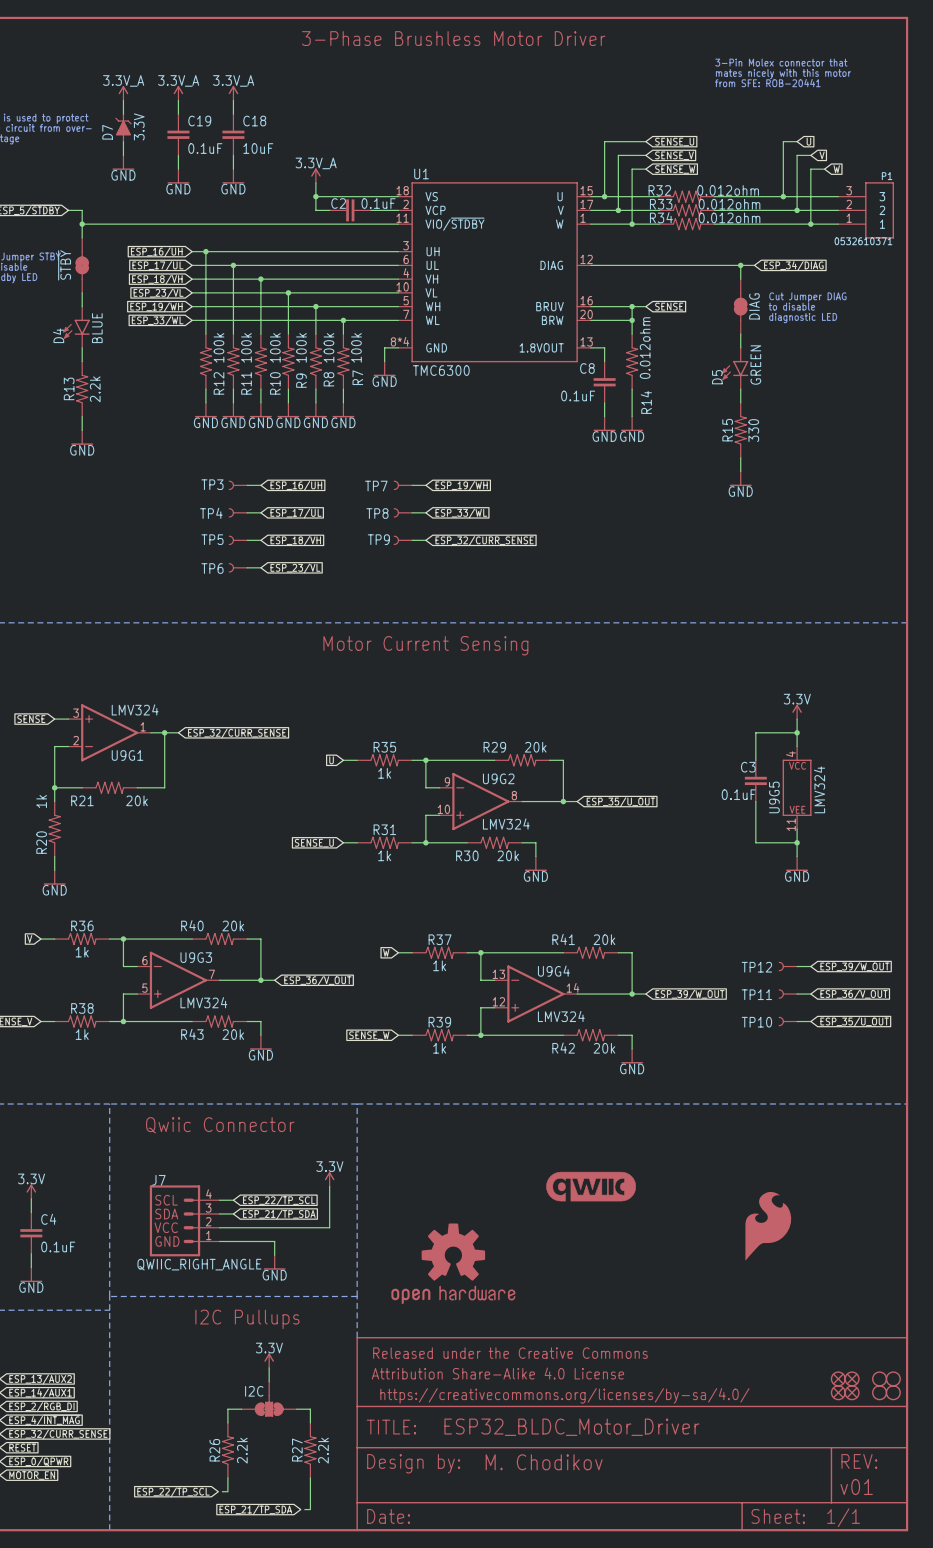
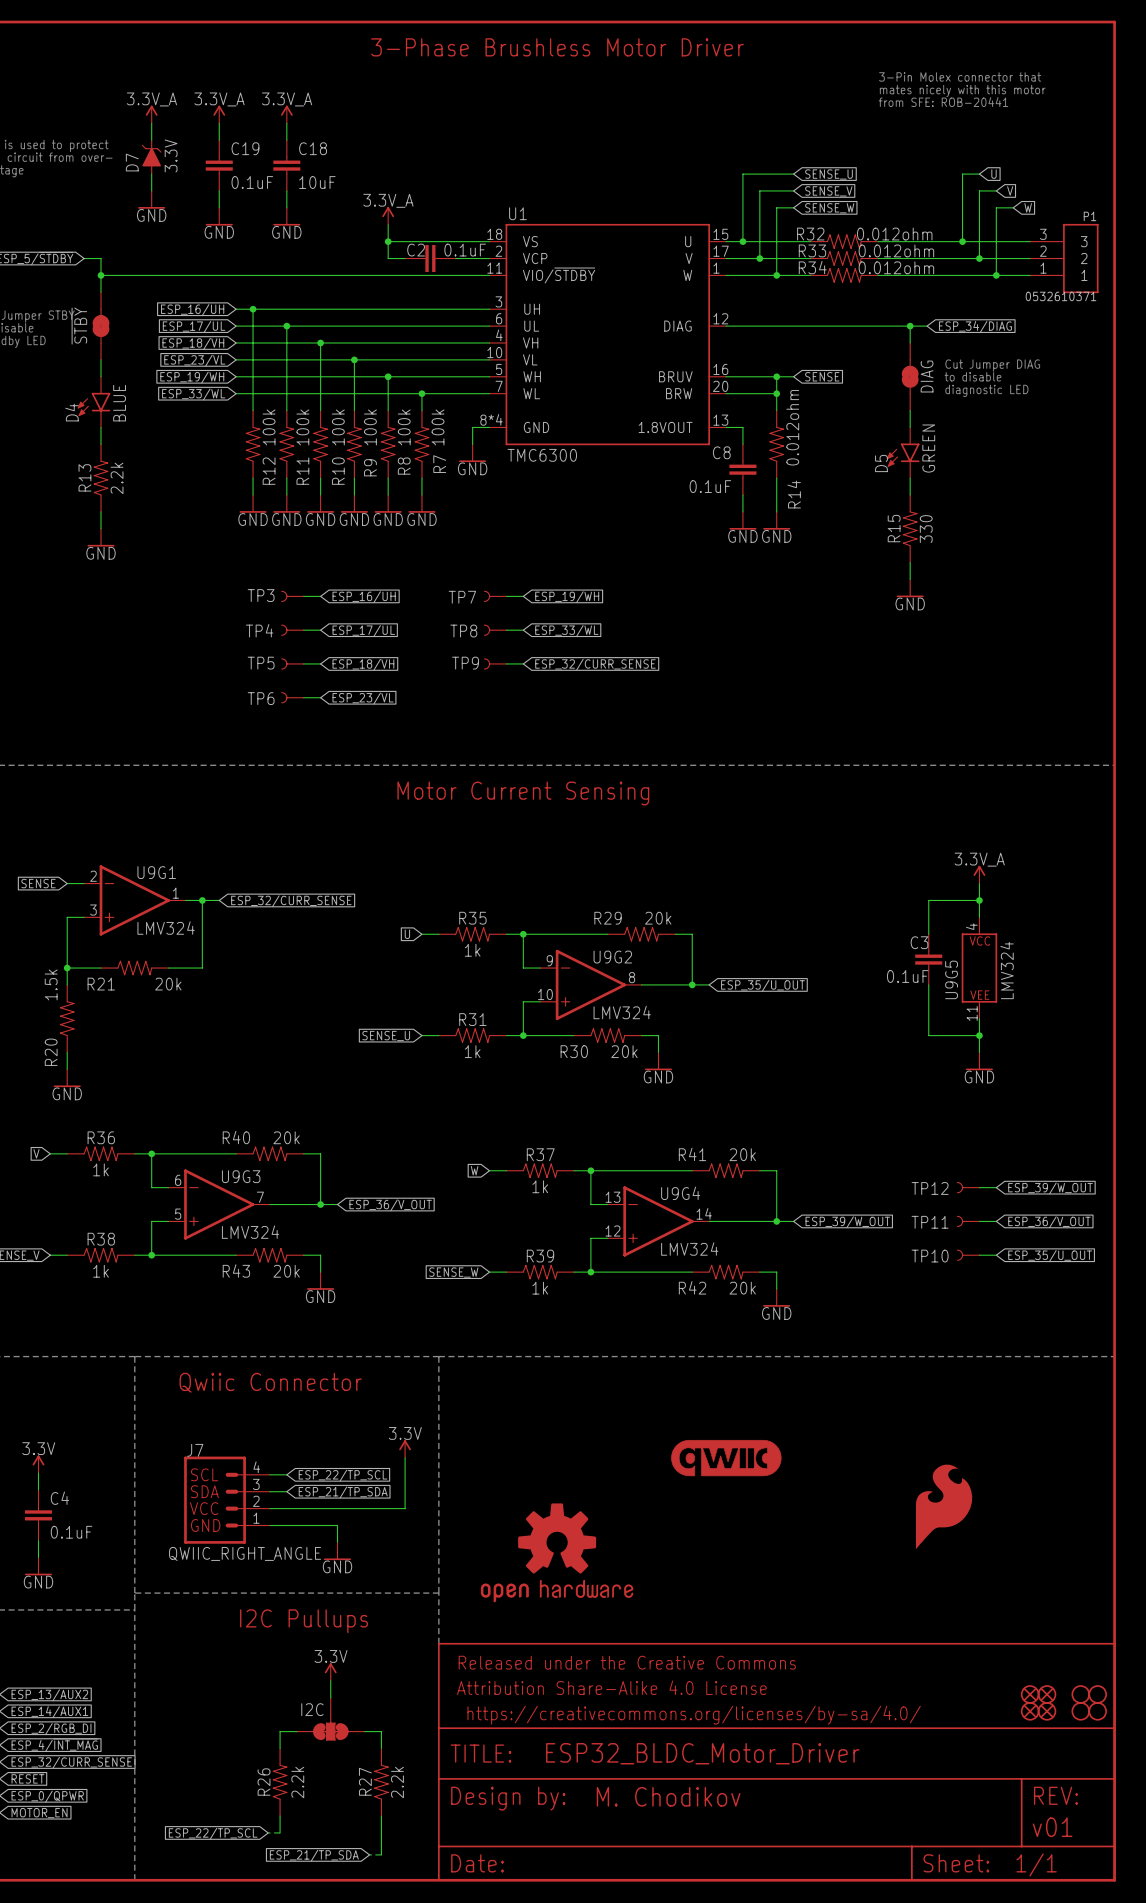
power symbol: 3.3V (797, 711) -> 3.3V_A (979, 874)
U9G1 flip: as is (109, 732) -> up-down (134, 900)
R20 value: 1k (41, 801) -> 1.5k (51, 984)
R20 name position: R20 (41, 842) -> R20 (51, 1052)

